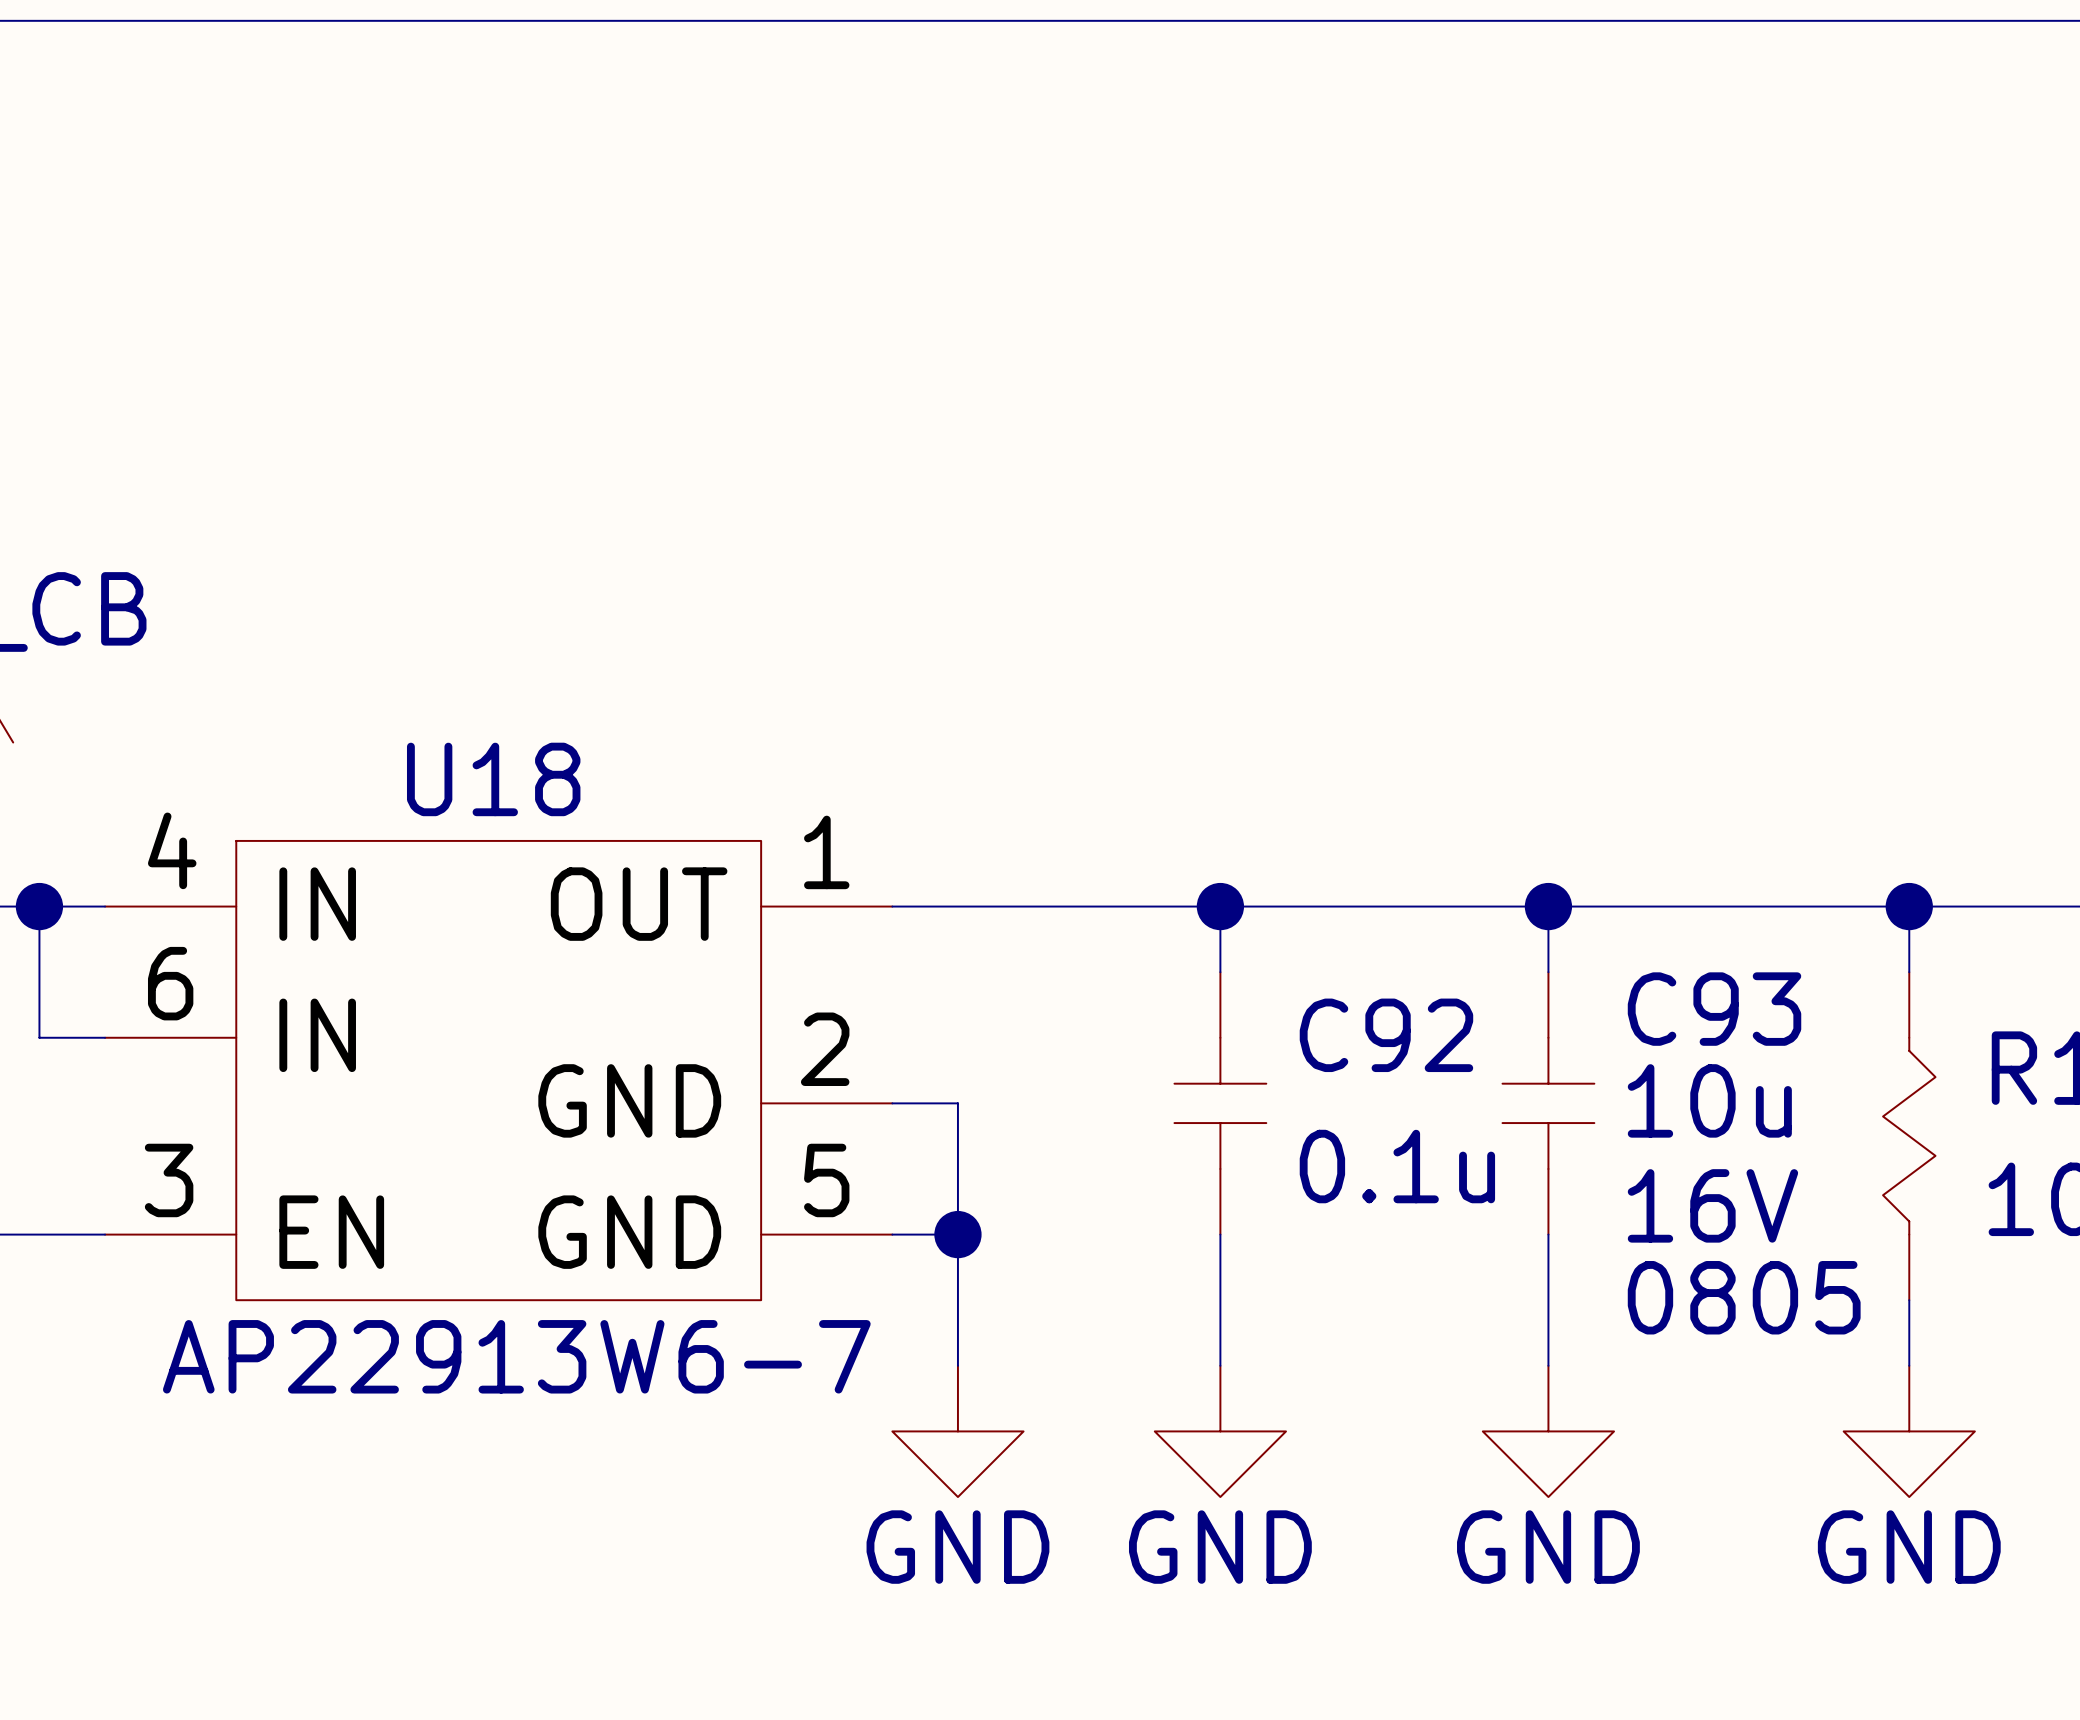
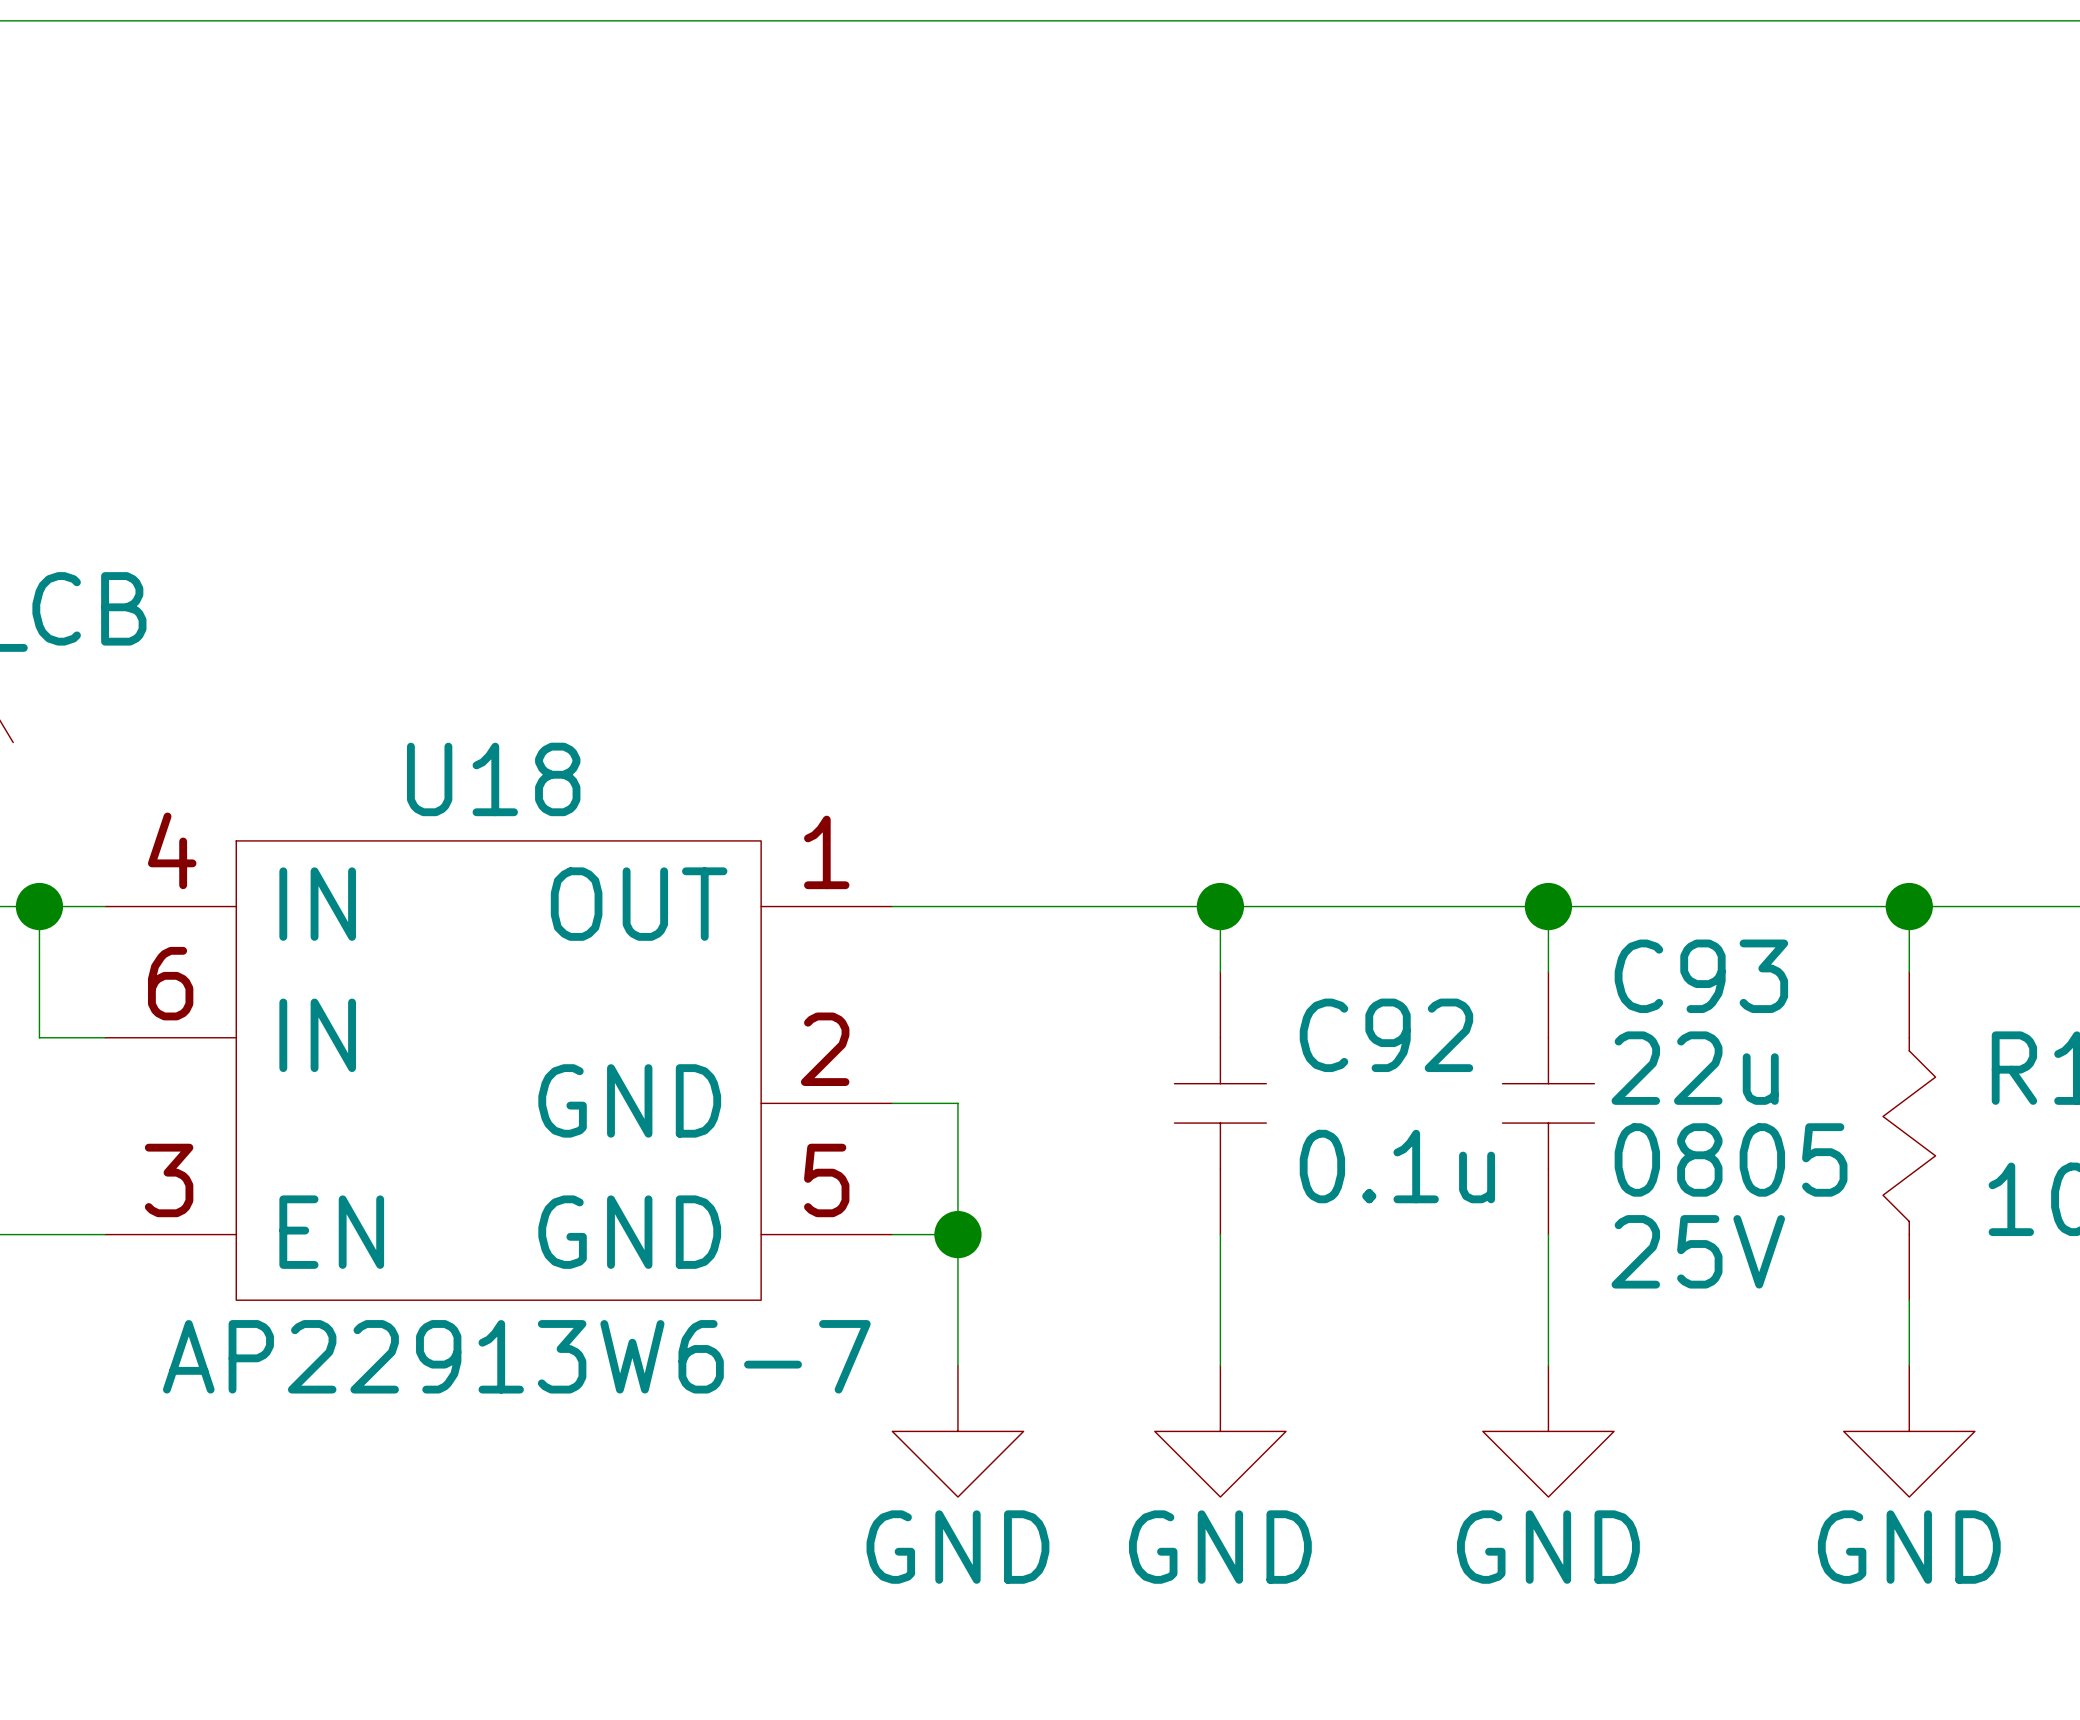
C93 name position: C93 (1714, 1009) -> C93 (1701, 976)
C93 value: 10u (1709, 1100) -> 22u (1695, 1068)
C93 text: 16V (1712, 1205) -> 25V (1698, 1251)
C93 text position: 0805 (1744, 1297) -> 0805 (1731, 1159)

